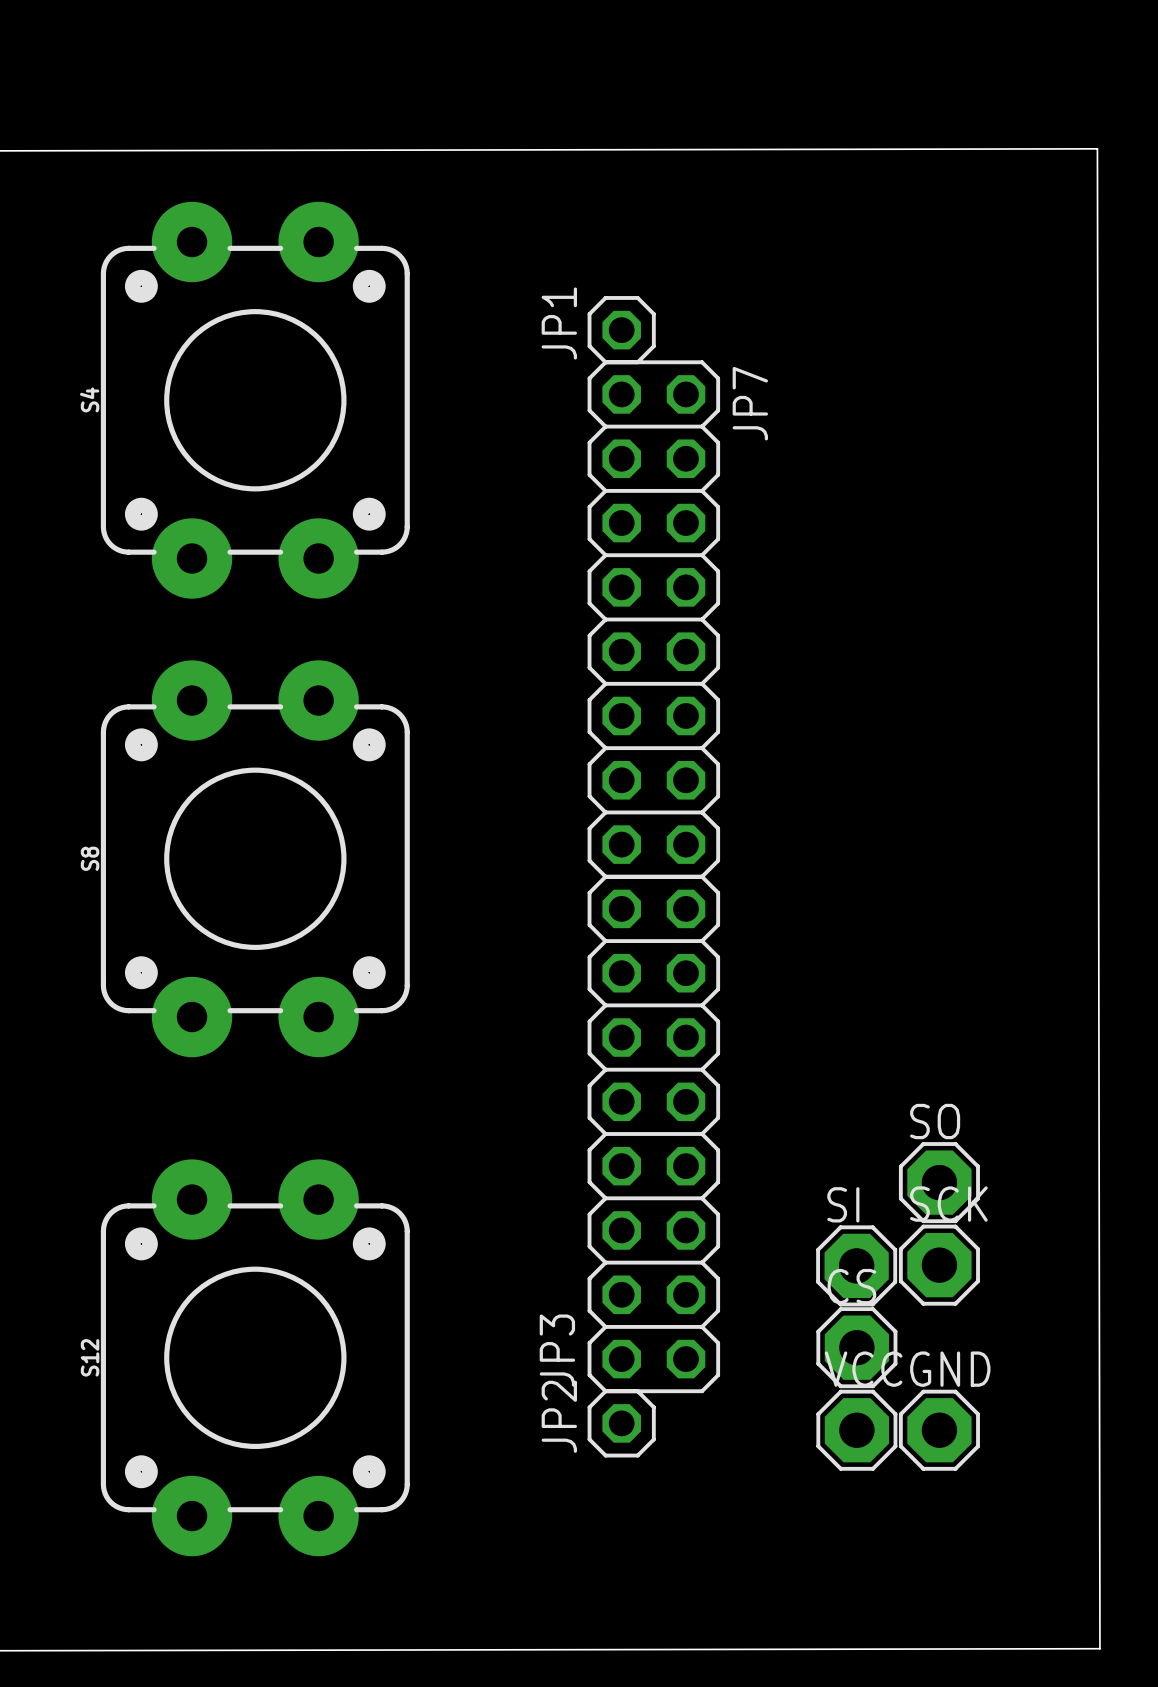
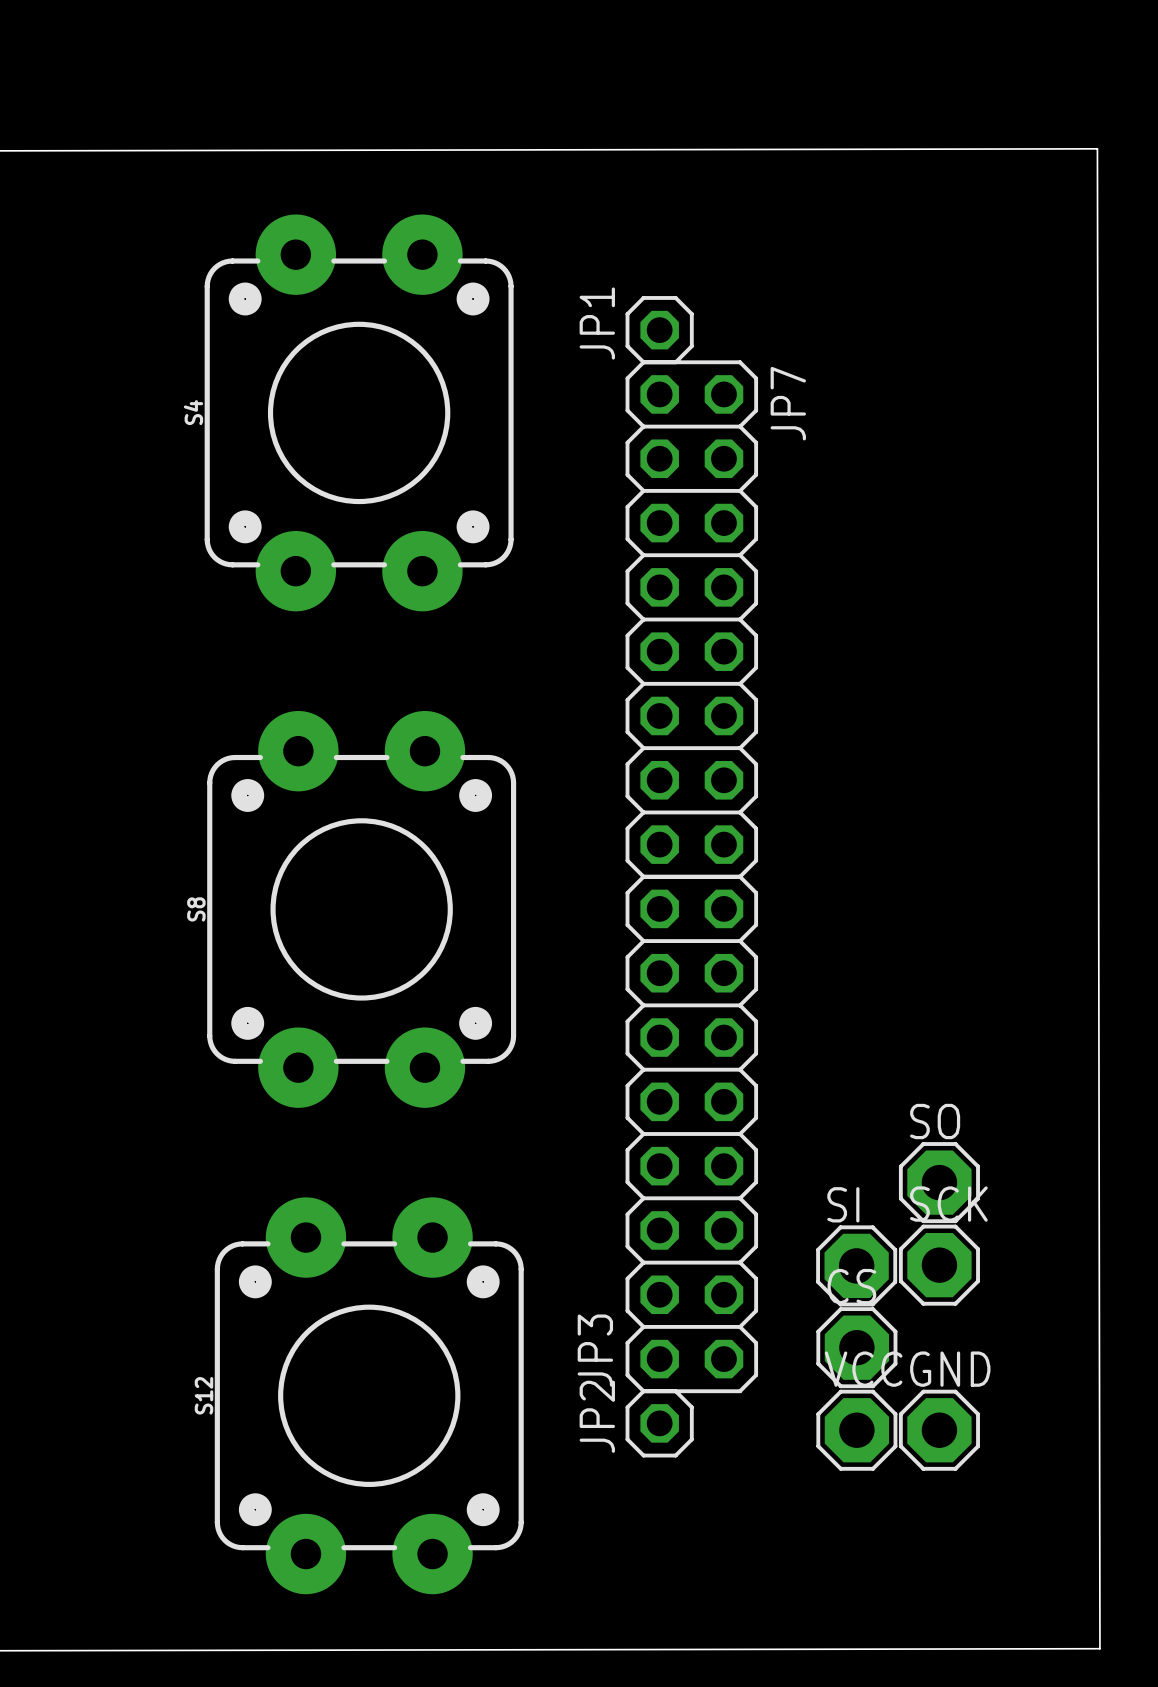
JP1 position: (621, 330) -> (659, 330)
S4 position: (255, 400) -> (359, 412)
JP7 position: (653, 619) -> (691, 619)
S8 position: (255, 858) -> (361, 909)
JP3 position: (653, 1133) -> (691, 1133)
S12 position: (255, 1357) -> (369, 1395)
JP2 position: (621, 1423) -> (659, 1423)

